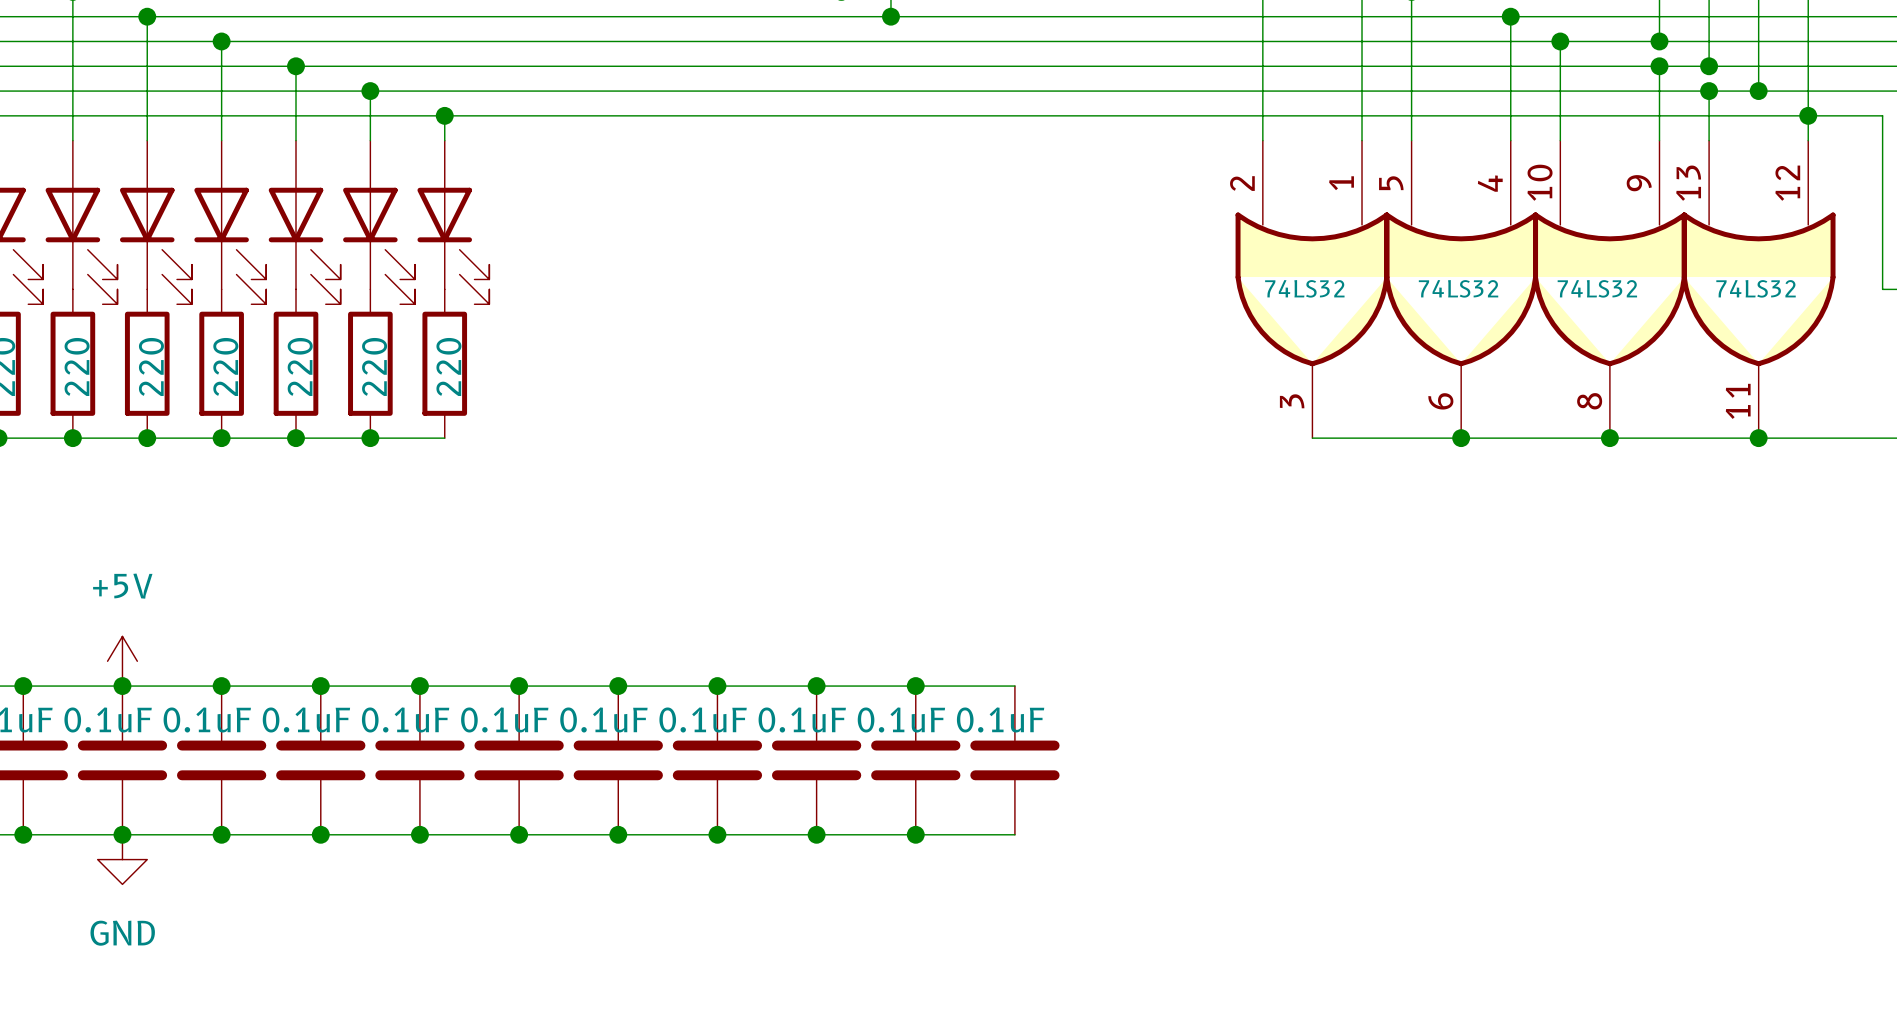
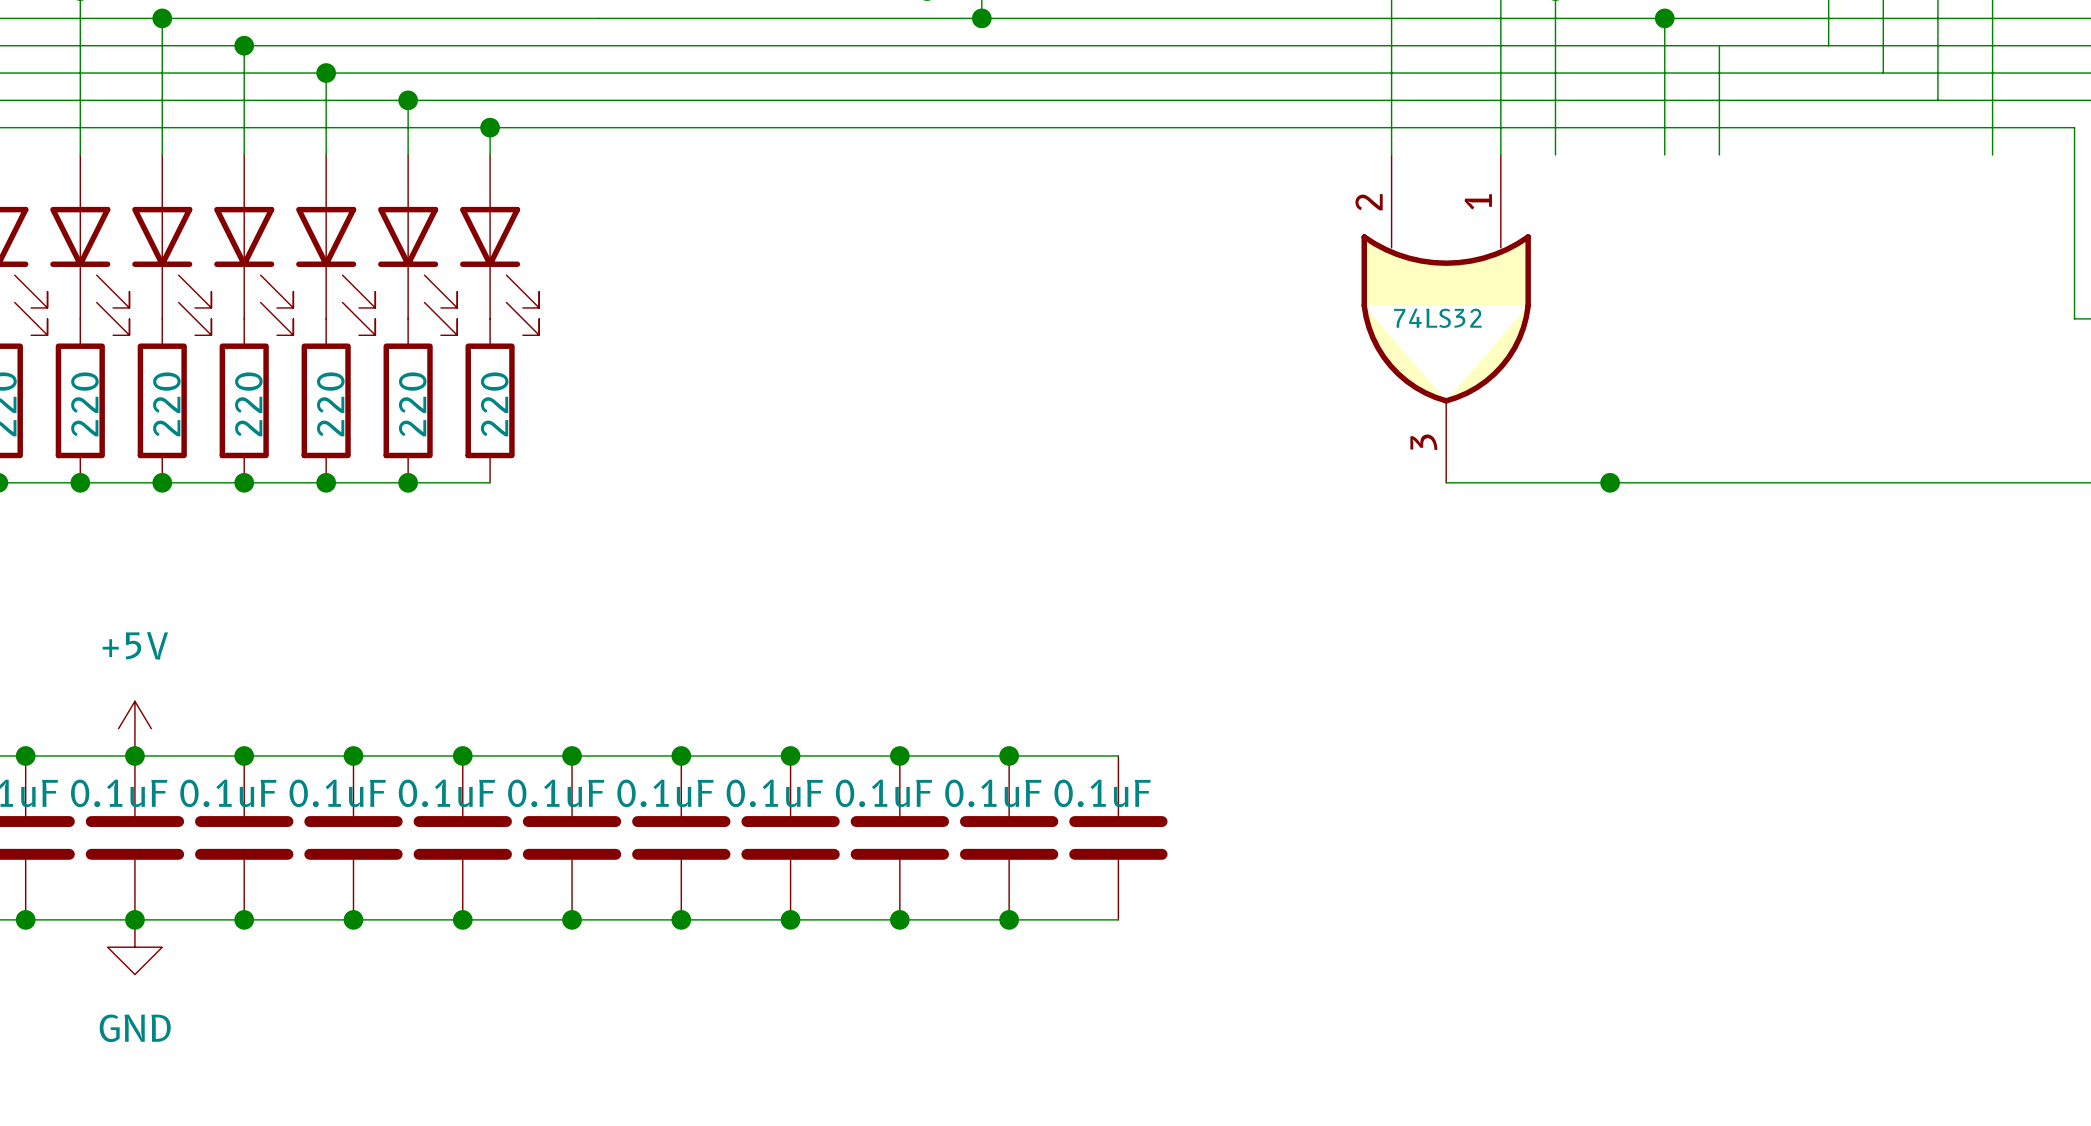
junction: (1560, 41) -> none
junction: (1659, 41) -> none
wire: (1659, 66) (1659, 140) -> none
junction: (1659, 66) -> none
junction: (1709, 66) -> none
wire: (1709, 91) (1709, 140) -> none
junction: (1709, 91) -> none
junction: (1758, 91) -> none
junction: (1808, 115) -> none
part: 74LS32 (1461, 289) -> none
part: 74LS32 (1609, 289) -> none
part: 74LS32 (1758, 289) -> none
junction: (1609, 438) -> none
junction: (1758, 438) -> none

